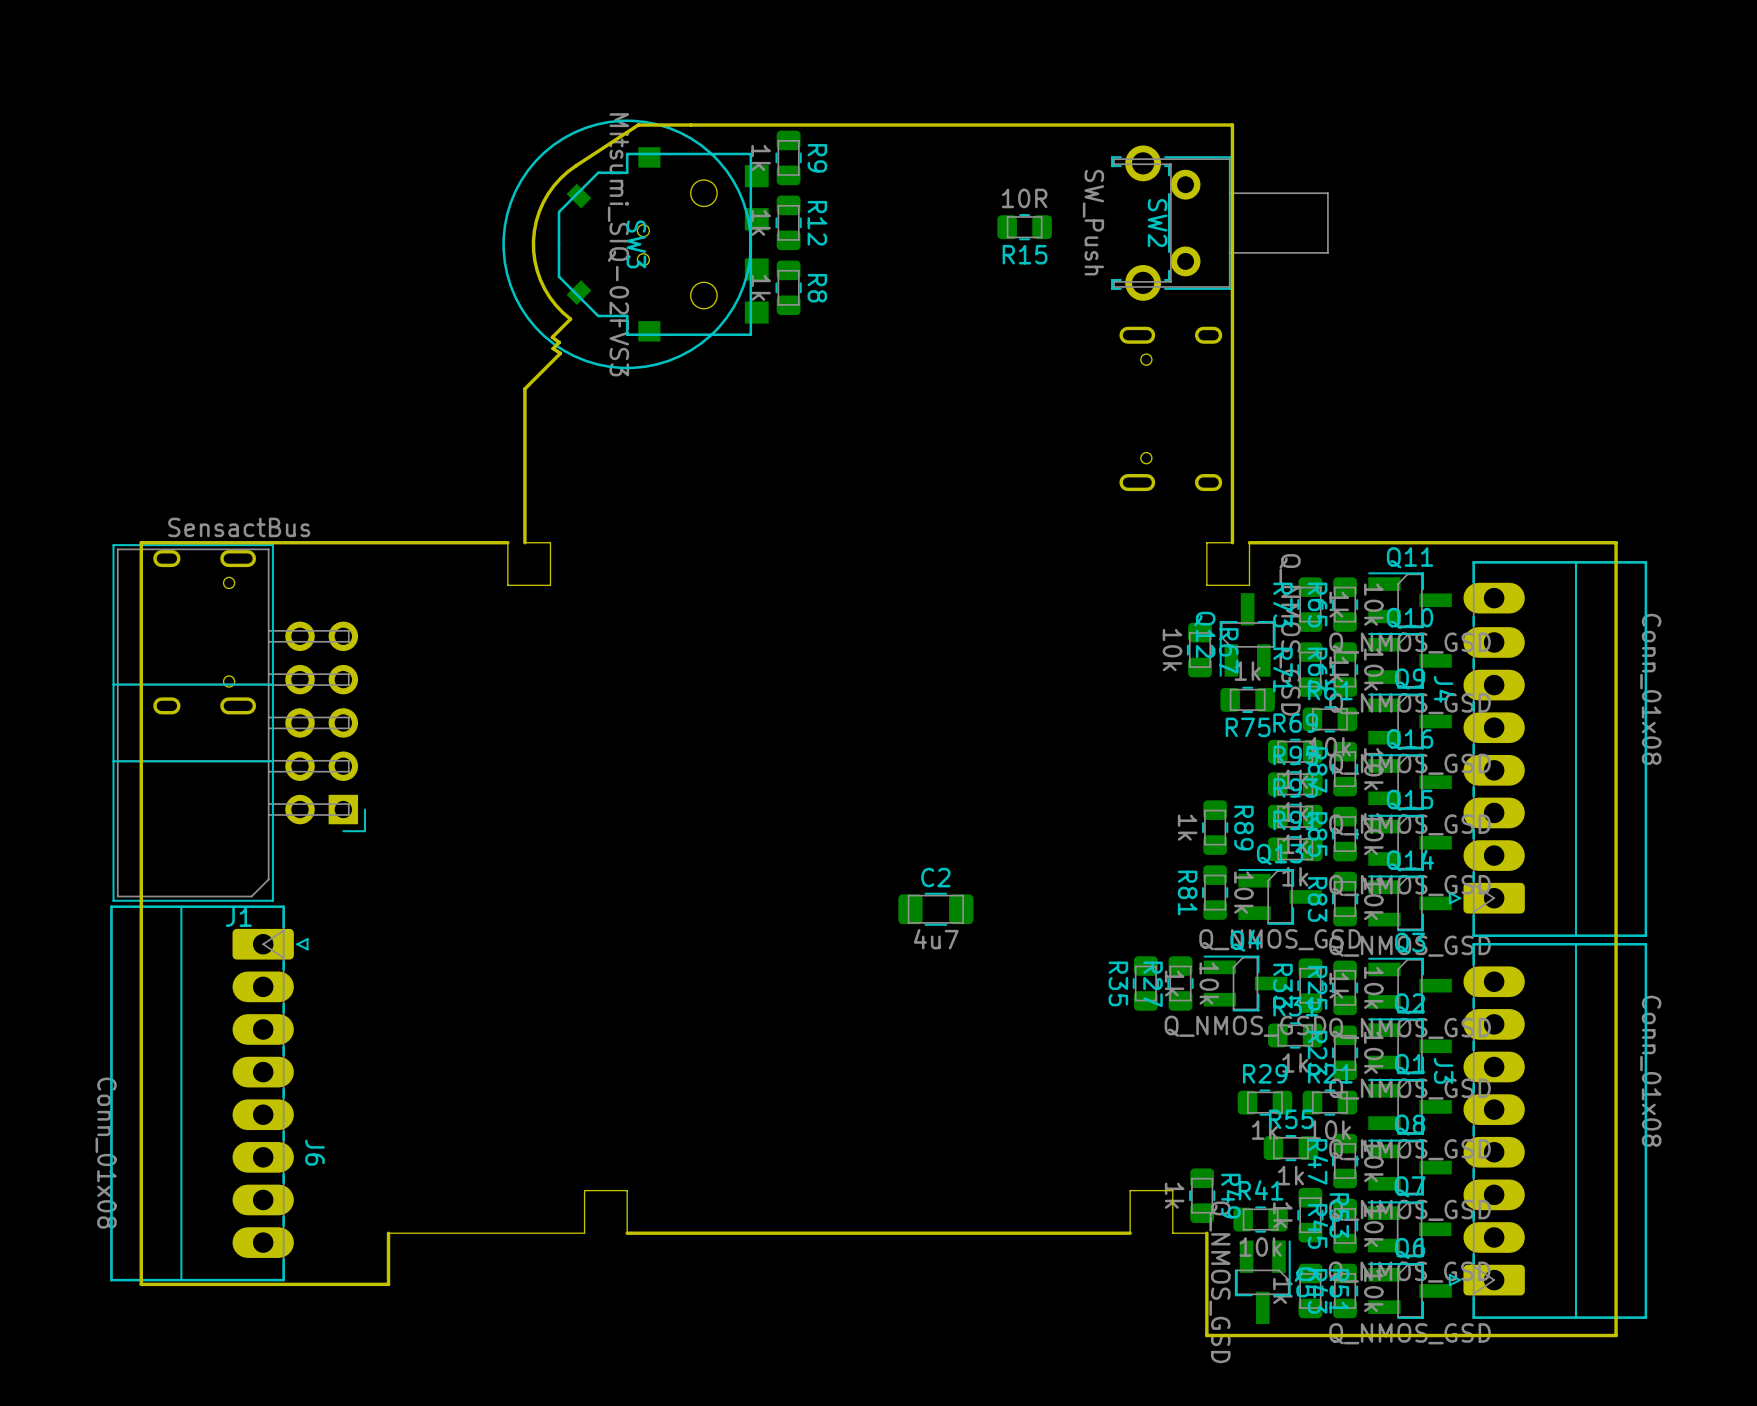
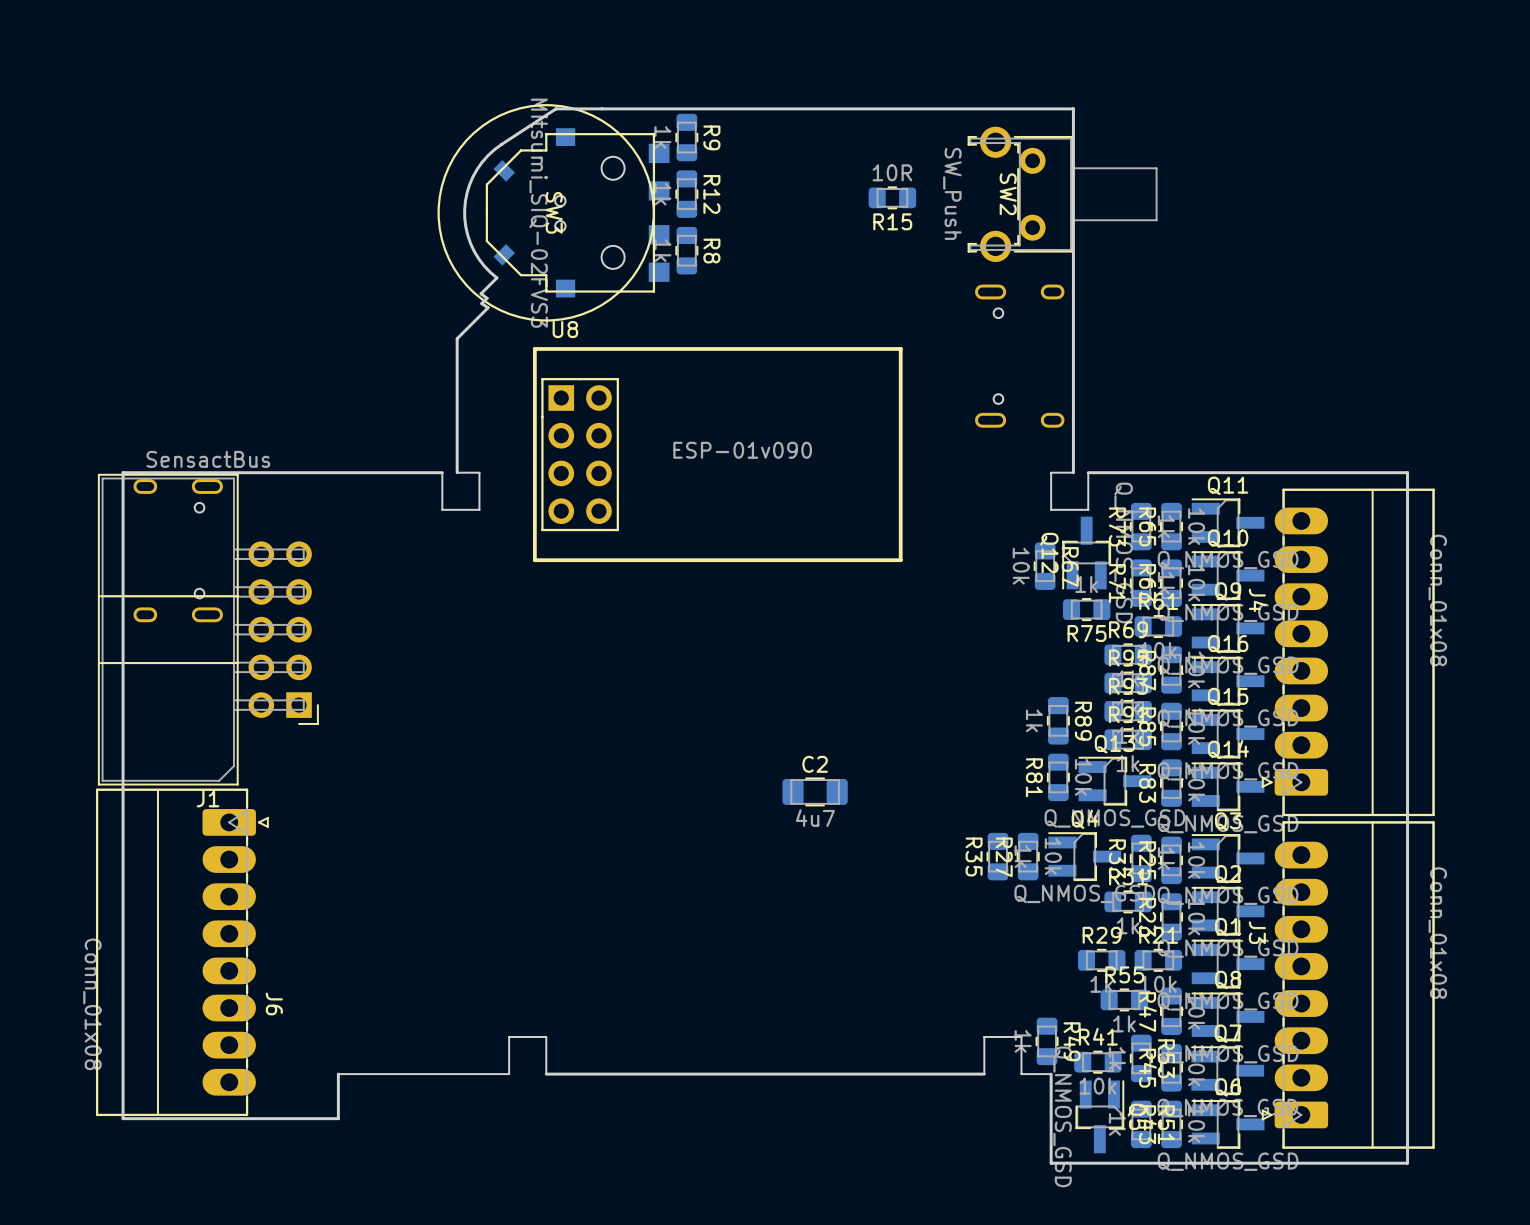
U8: none -> ESP-01v090 (717, 454)

